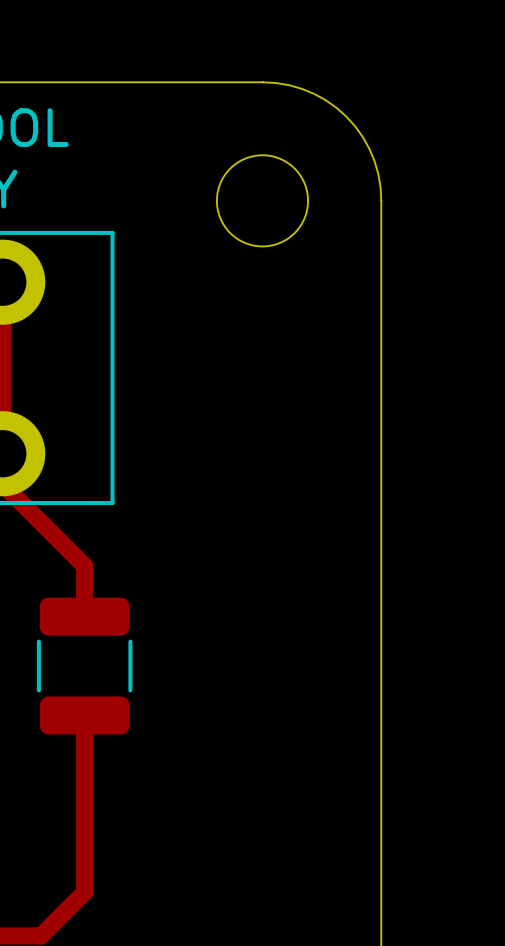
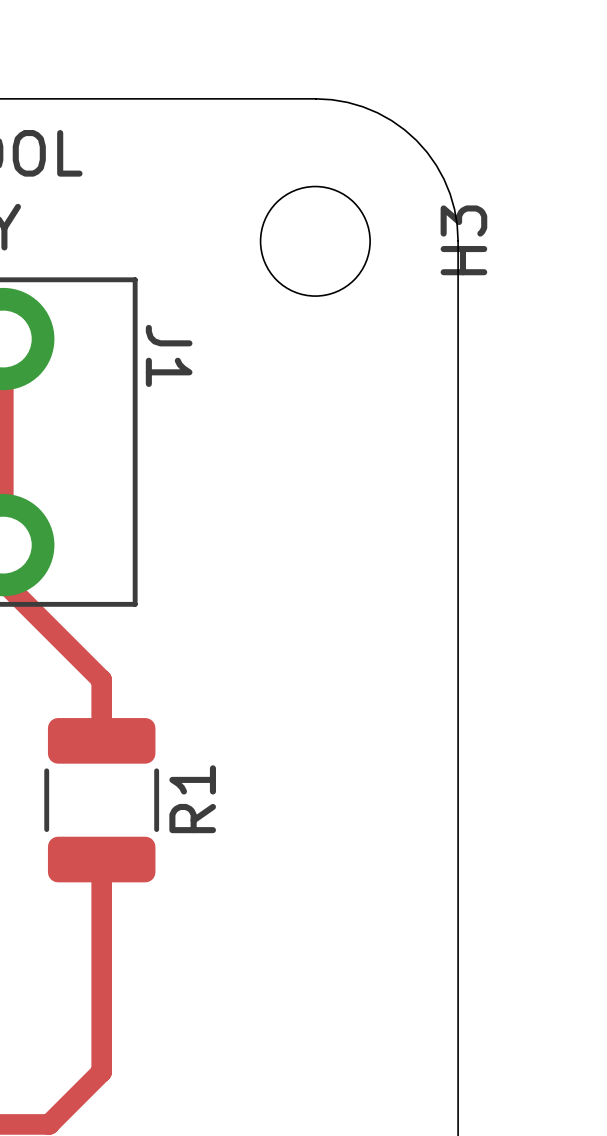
H3 name: none -> H3 (463, 240)
J1 name: none -> J1 (169, 355)
R1 name: none -> R1 (192, 799)

